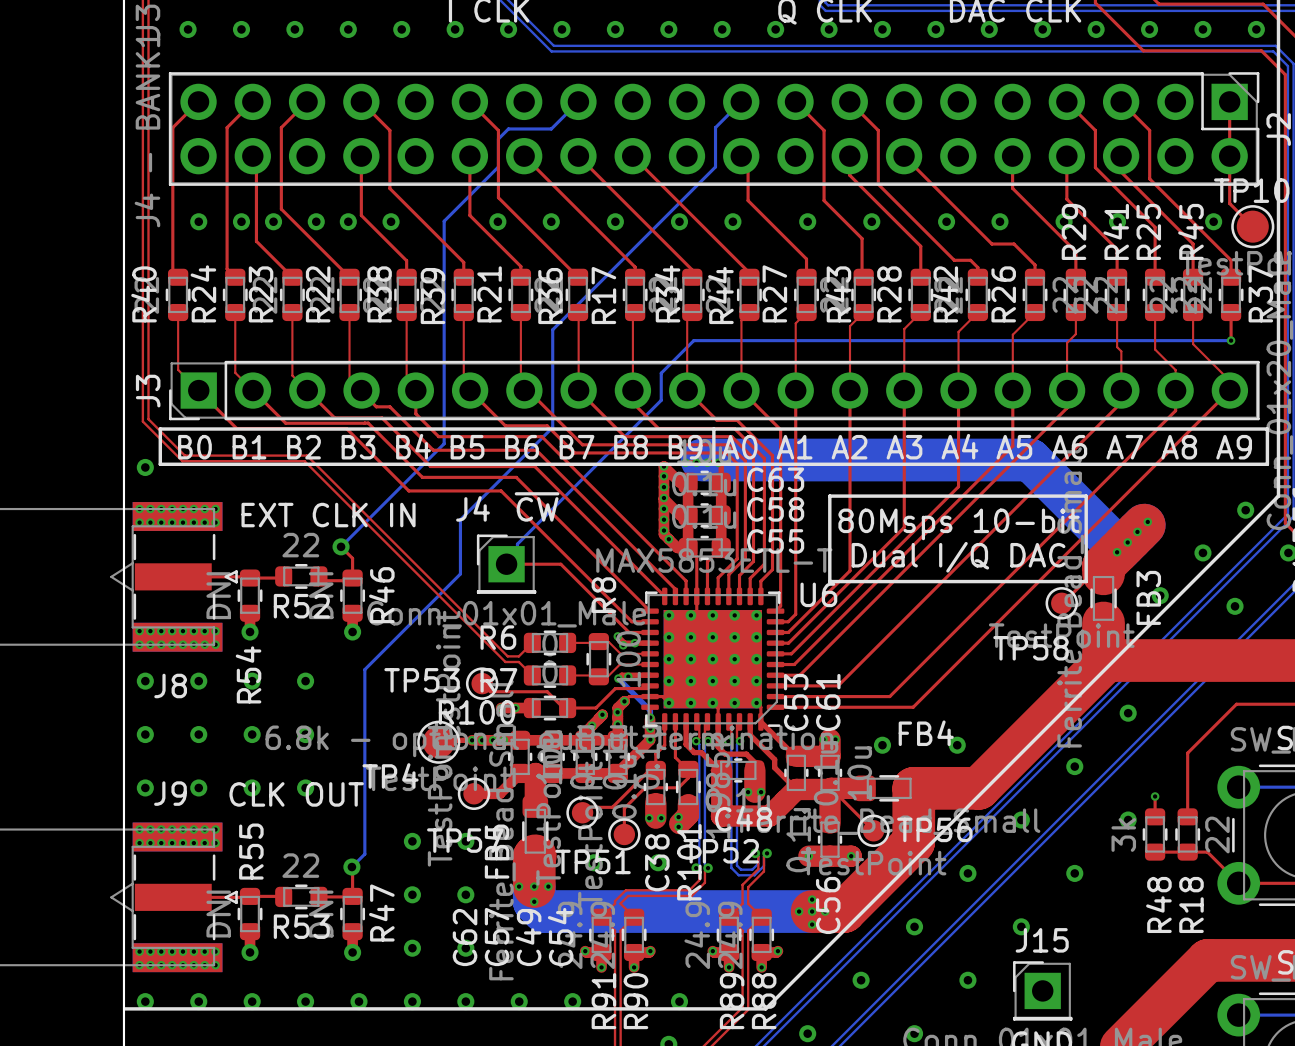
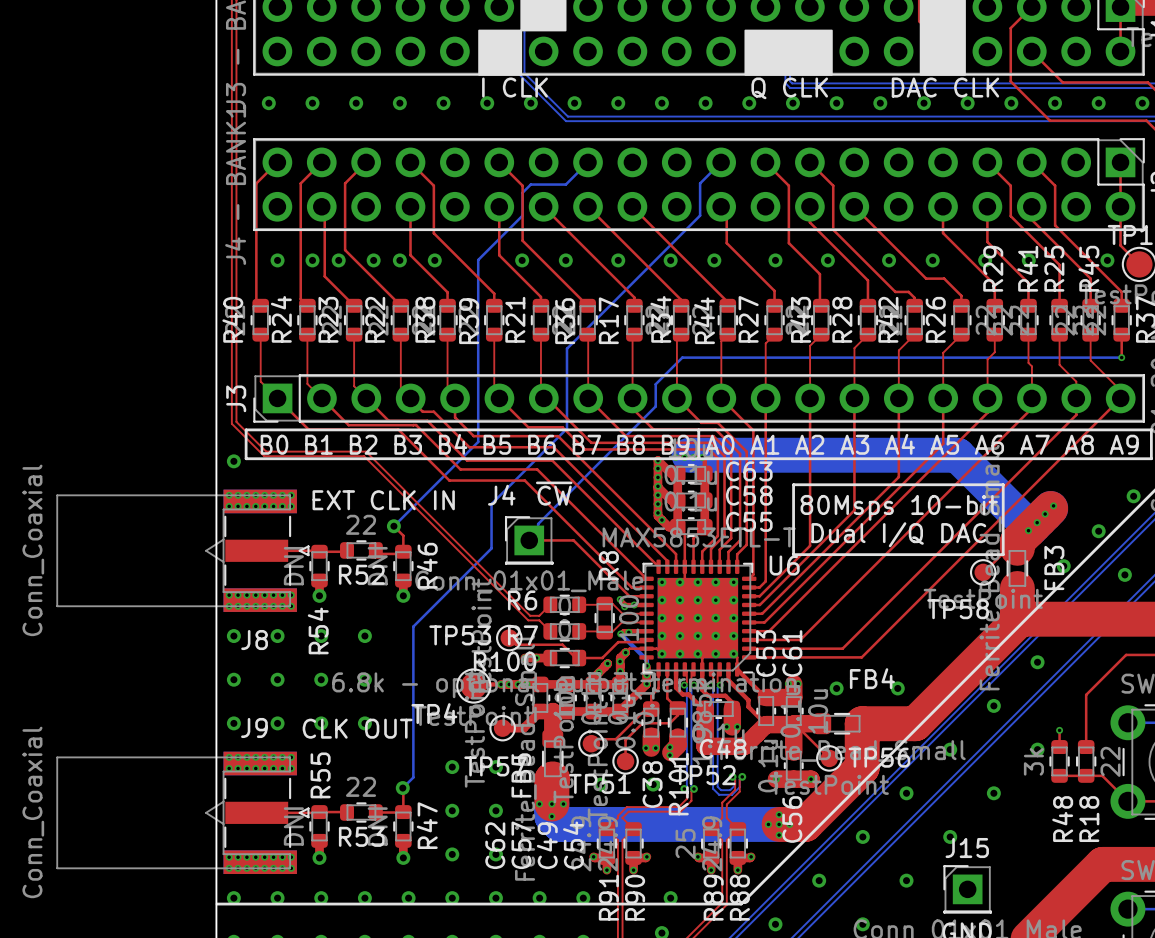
R89 value: 24.9 (697, 935) -> 25 (685, 843)

